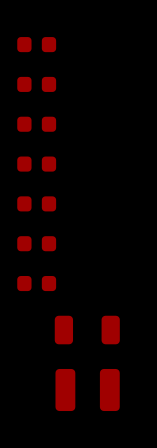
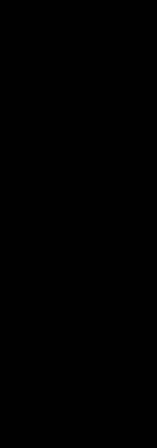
part: (36, 44) -> none
part: (36, 84) -> none
part: (36, 124) -> none
part: (36, 164) -> none
part: (36, 203) -> none
part: (36, 243) -> none
part: (36, 283) -> none
part: (87, 330) -> none
part: (87, 389) -> none

